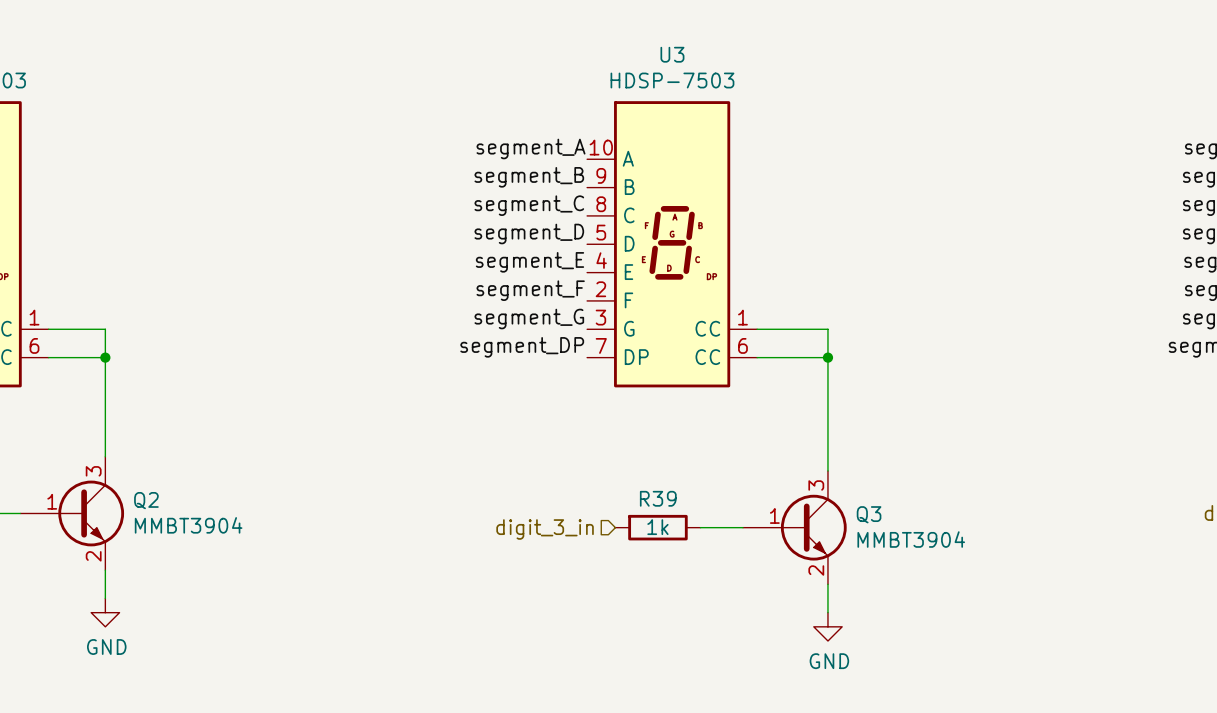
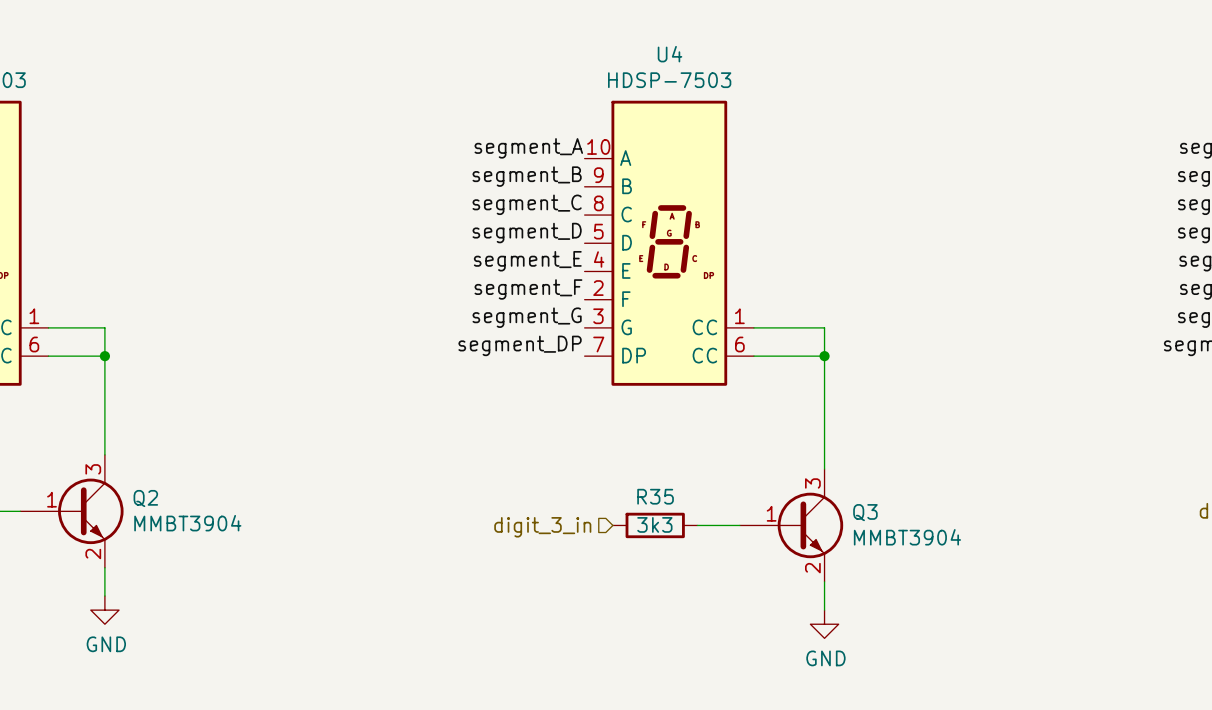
U3 name: U3 (672, 54) -> U4 (669, 54)
R39 name: R39 (658, 498) -> R35 (655, 496)
R39 value: 1k (657, 527) -> 3k3 (654, 524)

